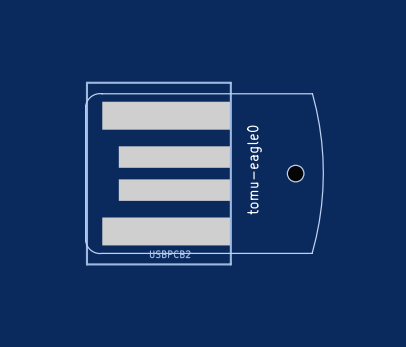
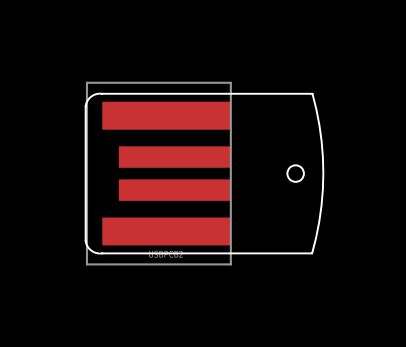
text: tomu-eagle0 (254, 170) -> none

